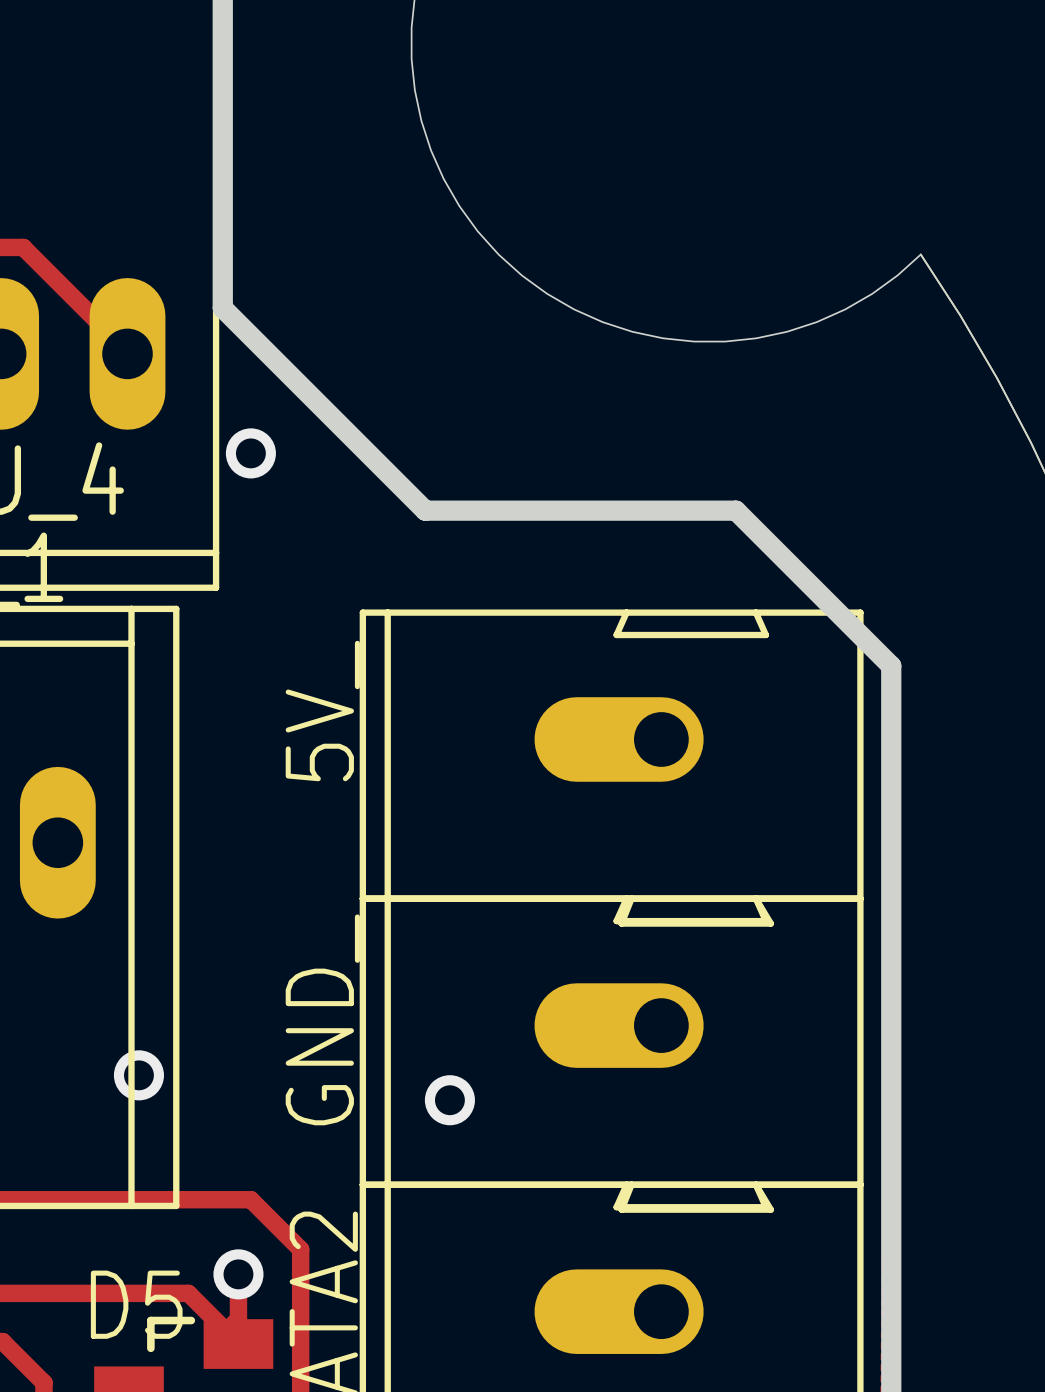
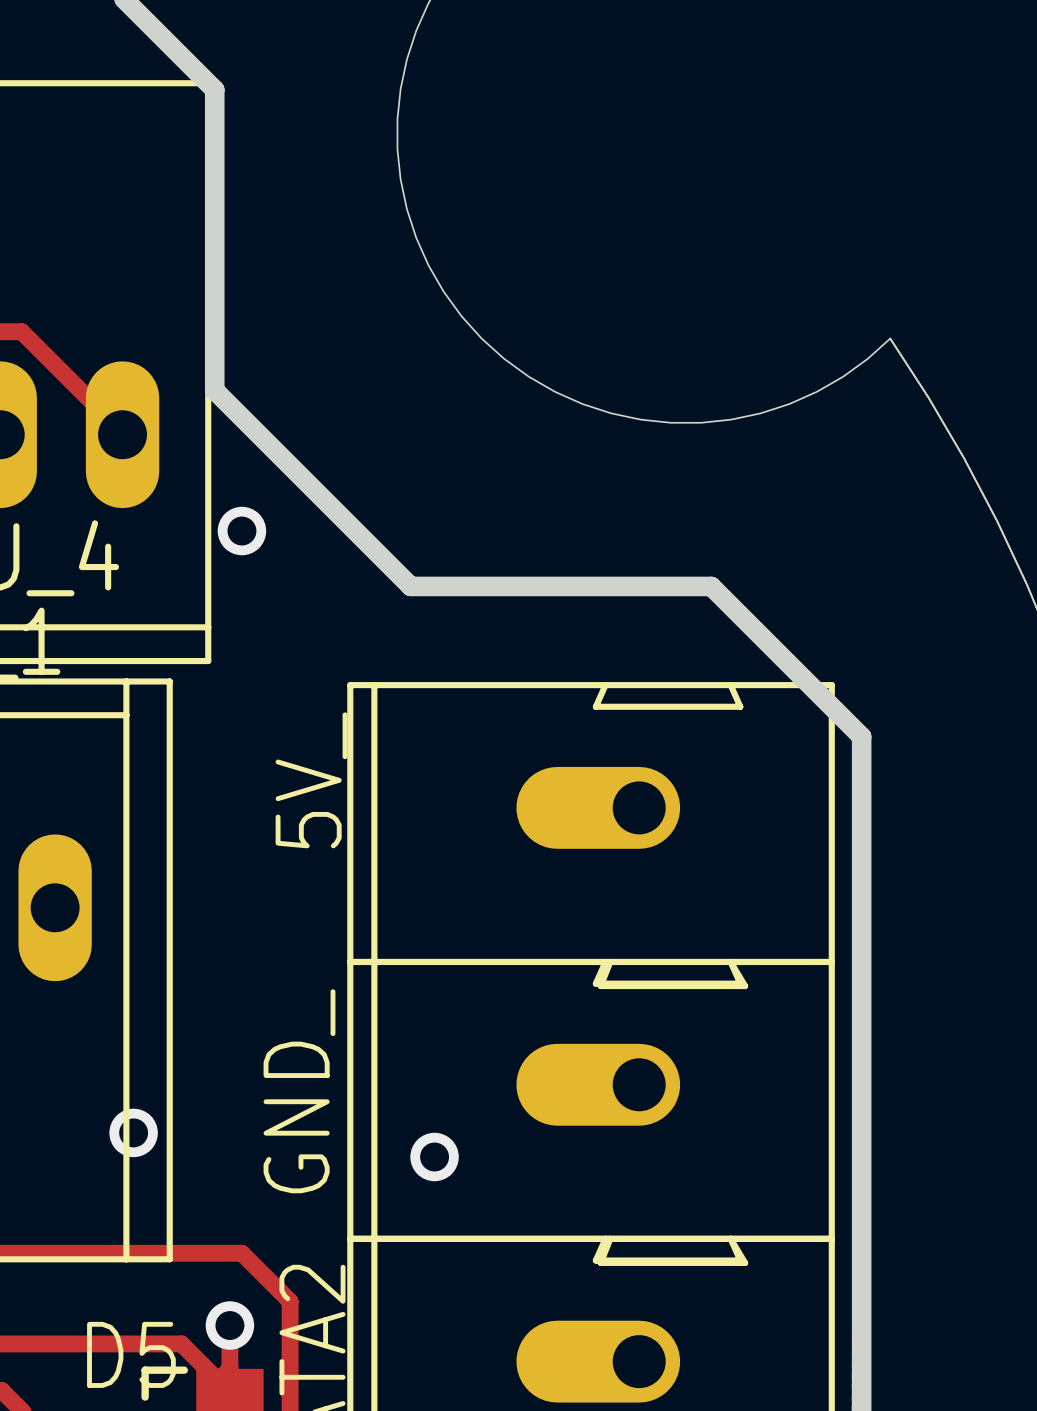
GND_ name position: GND_ (322, 1019) -> GND_ (299, 1091)

